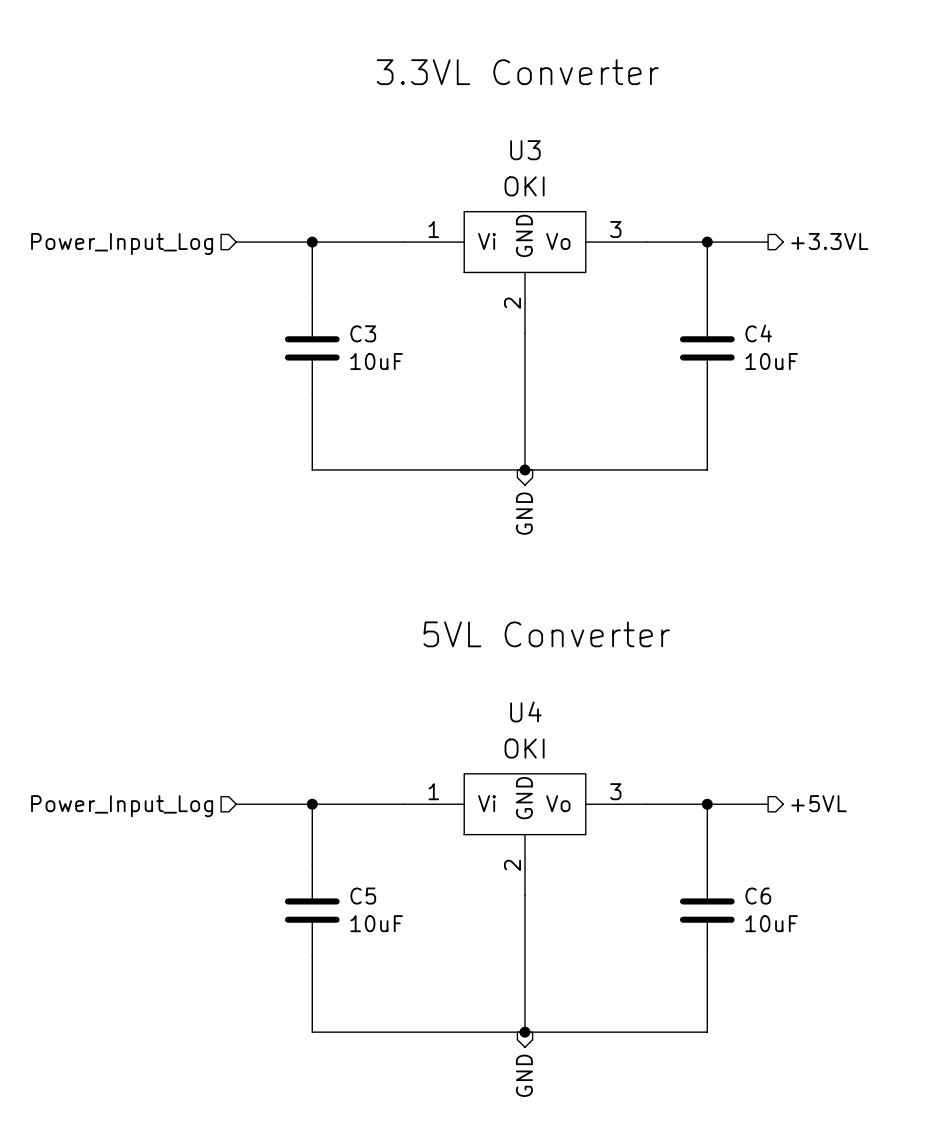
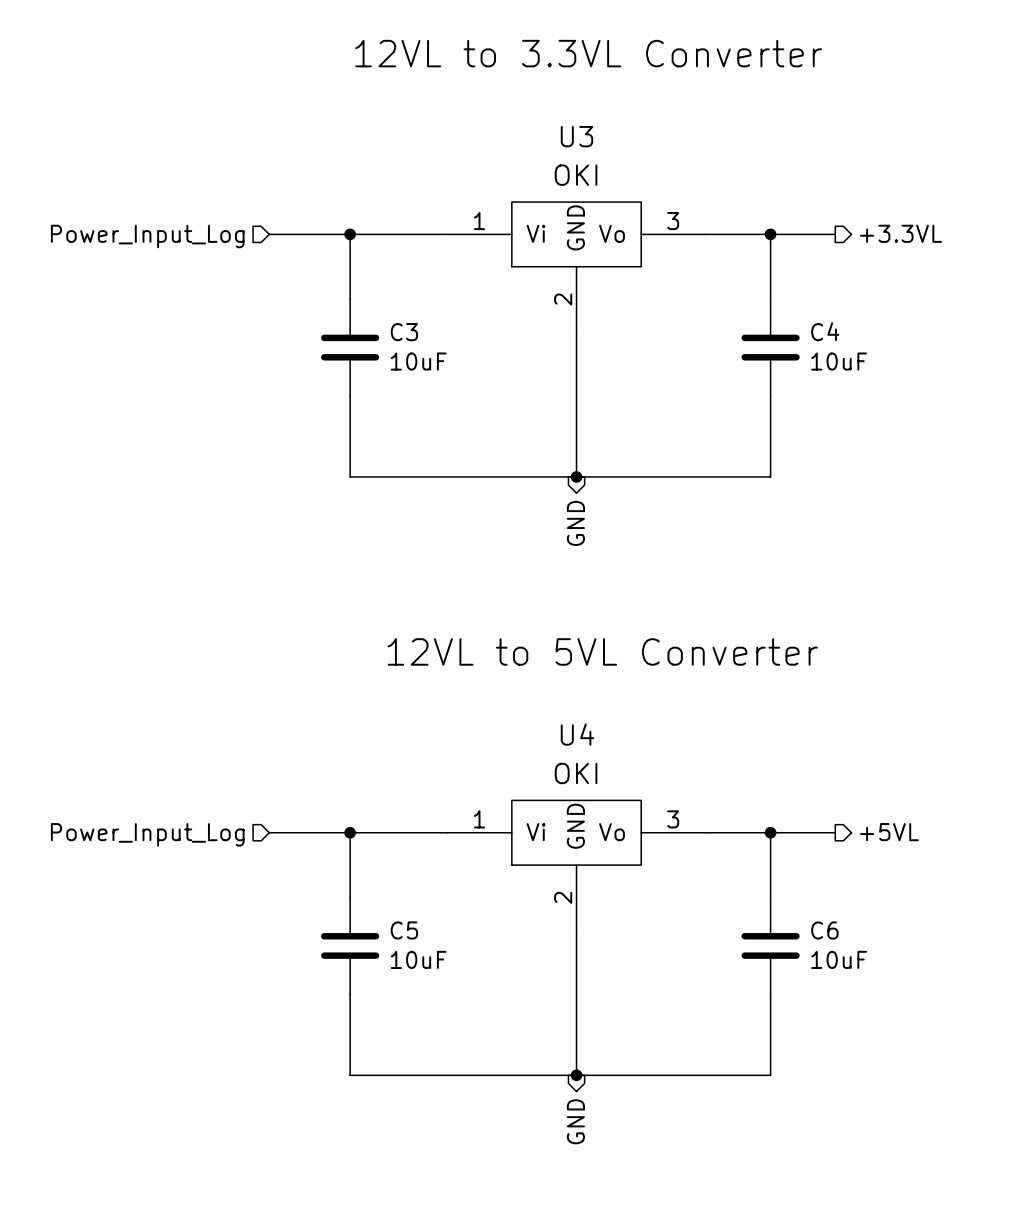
text: 3.3VL Converter (517, 72) -> 12VL to 3.3VL Converter (588, 53)
text: 5VL Converter (546, 634) -> 12VL to 5VL Converter (602, 651)

